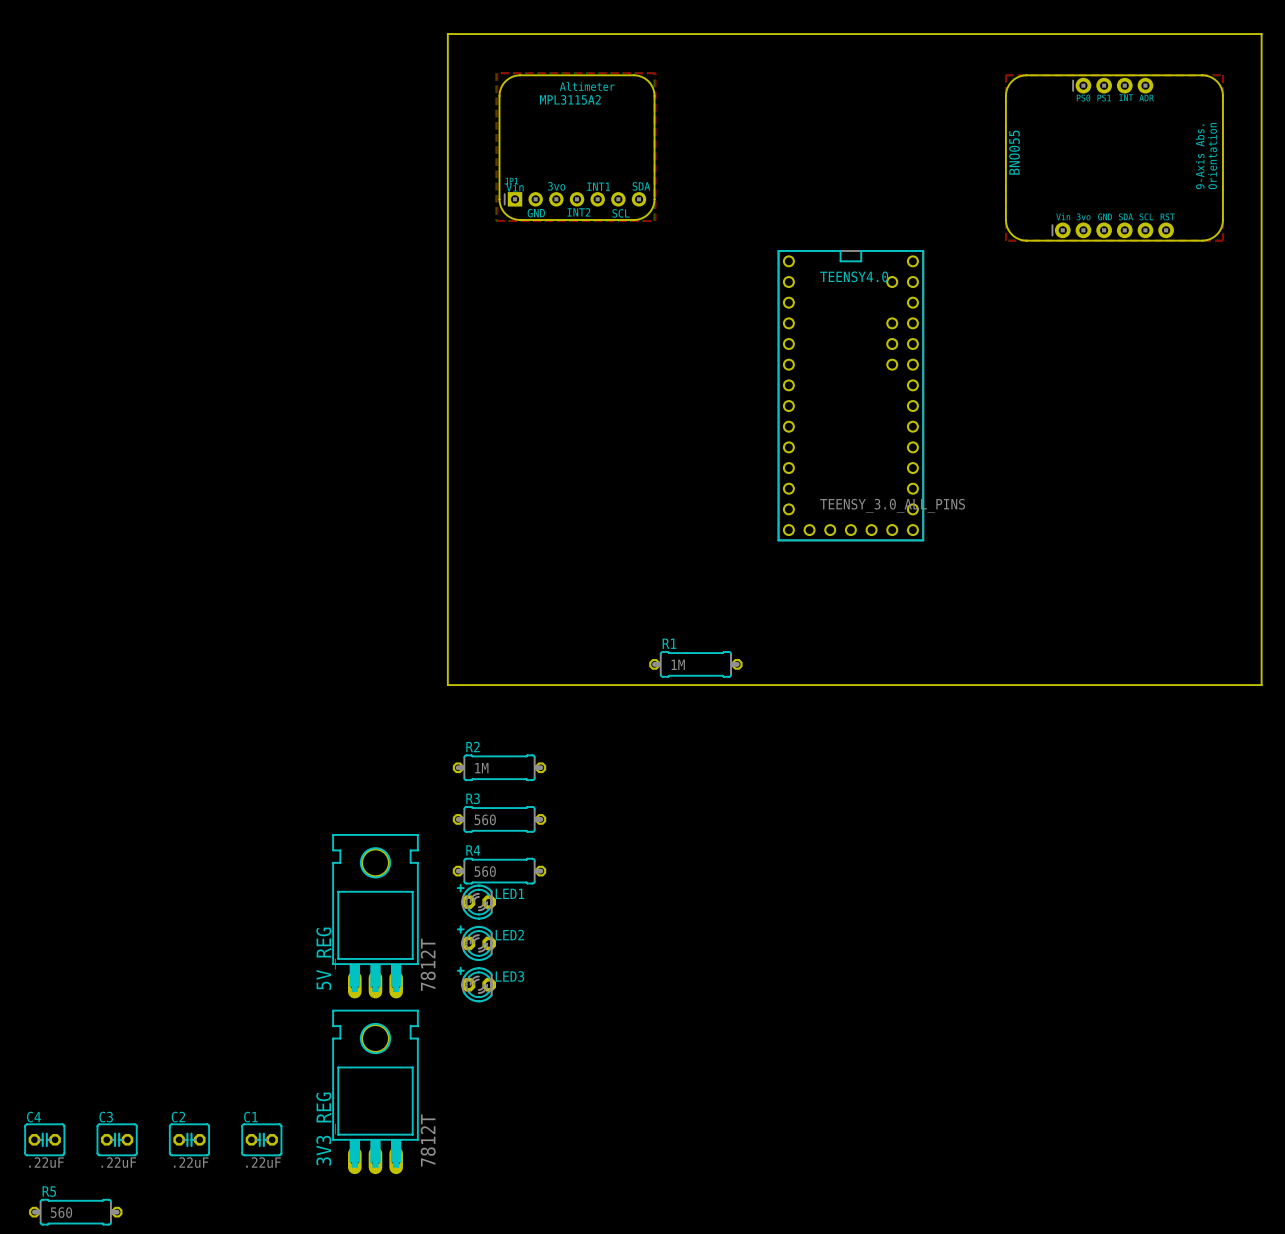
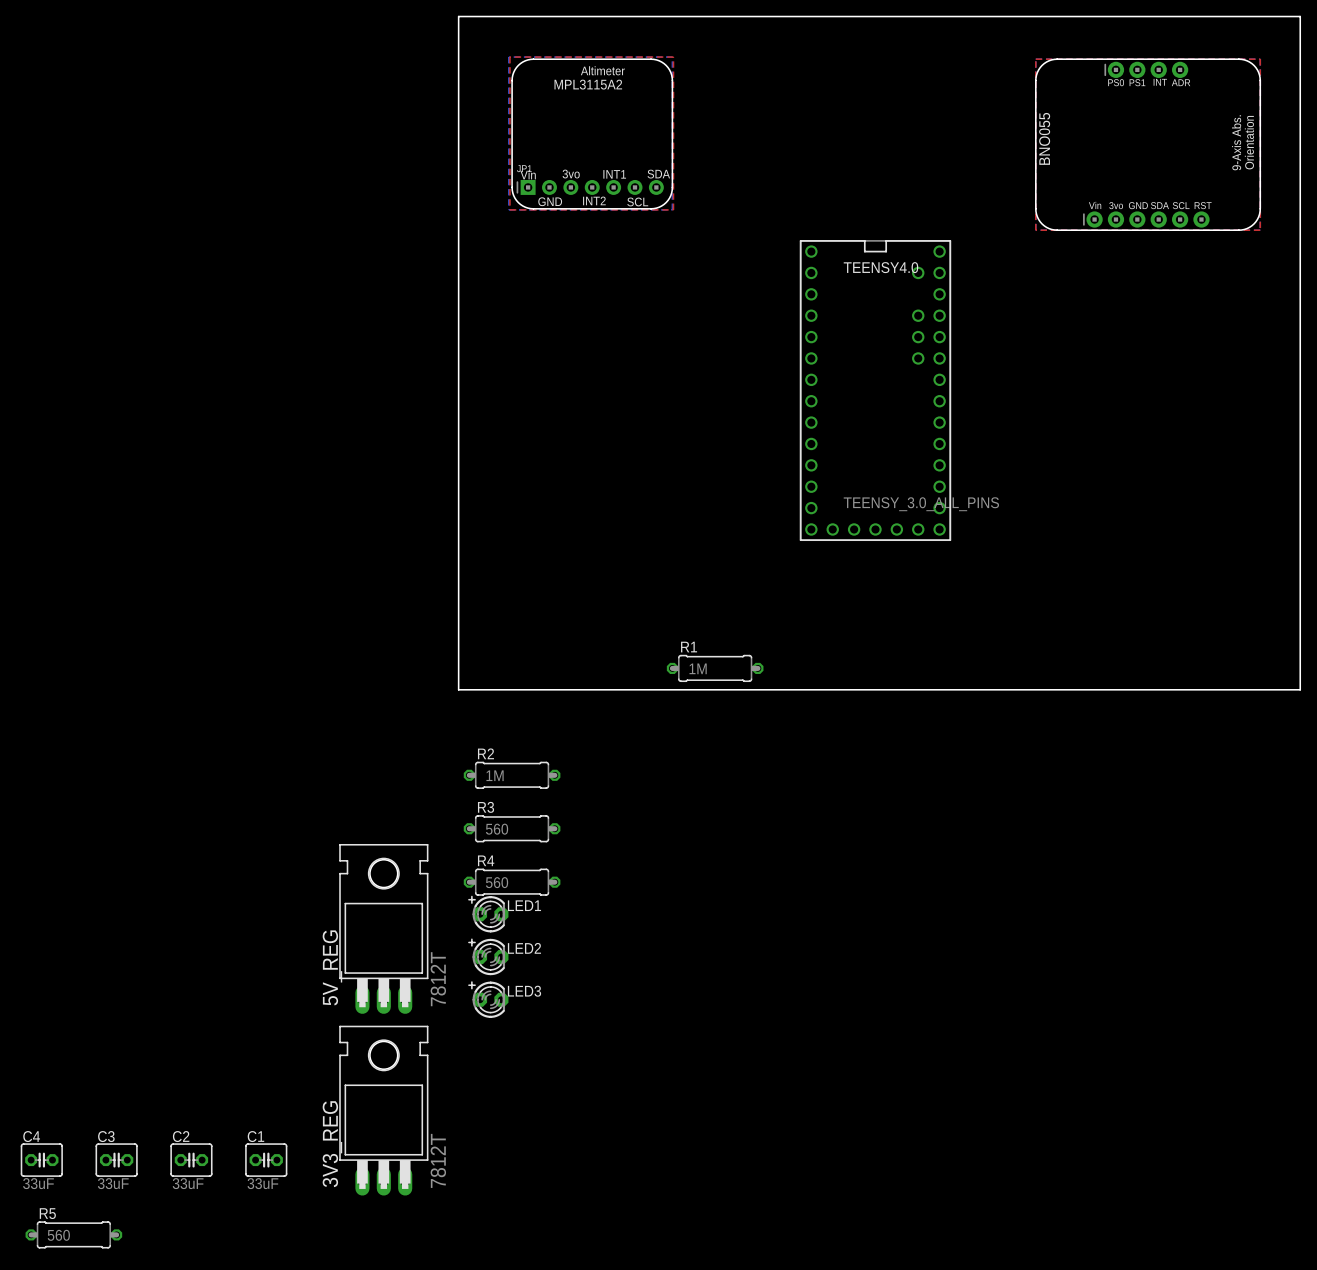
C4 value: .22uF (46, 1162) -> 33uF (38, 1183)
C3 value: .22uF (118, 1162) -> 33uF (113, 1183)
C2 value: .22uF (191, 1162) -> 33uF (188, 1183)
C1 value: .22uF (263, 1162) -> 33uF (262, 1183)

